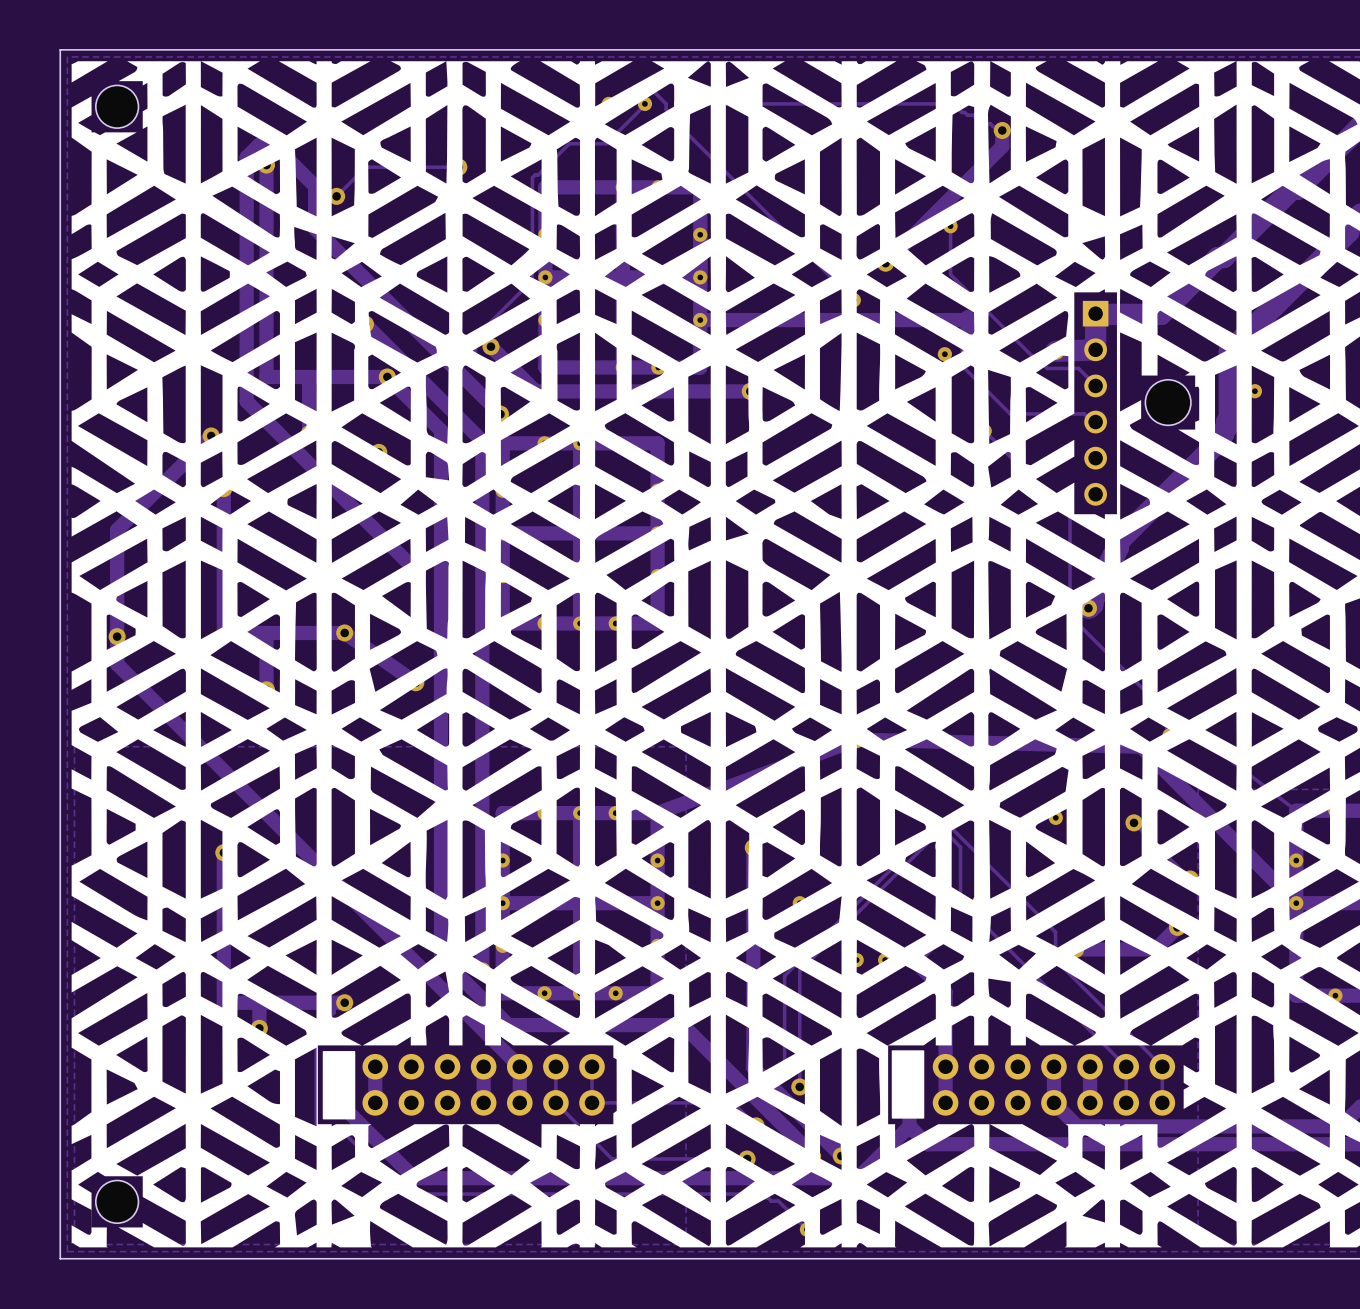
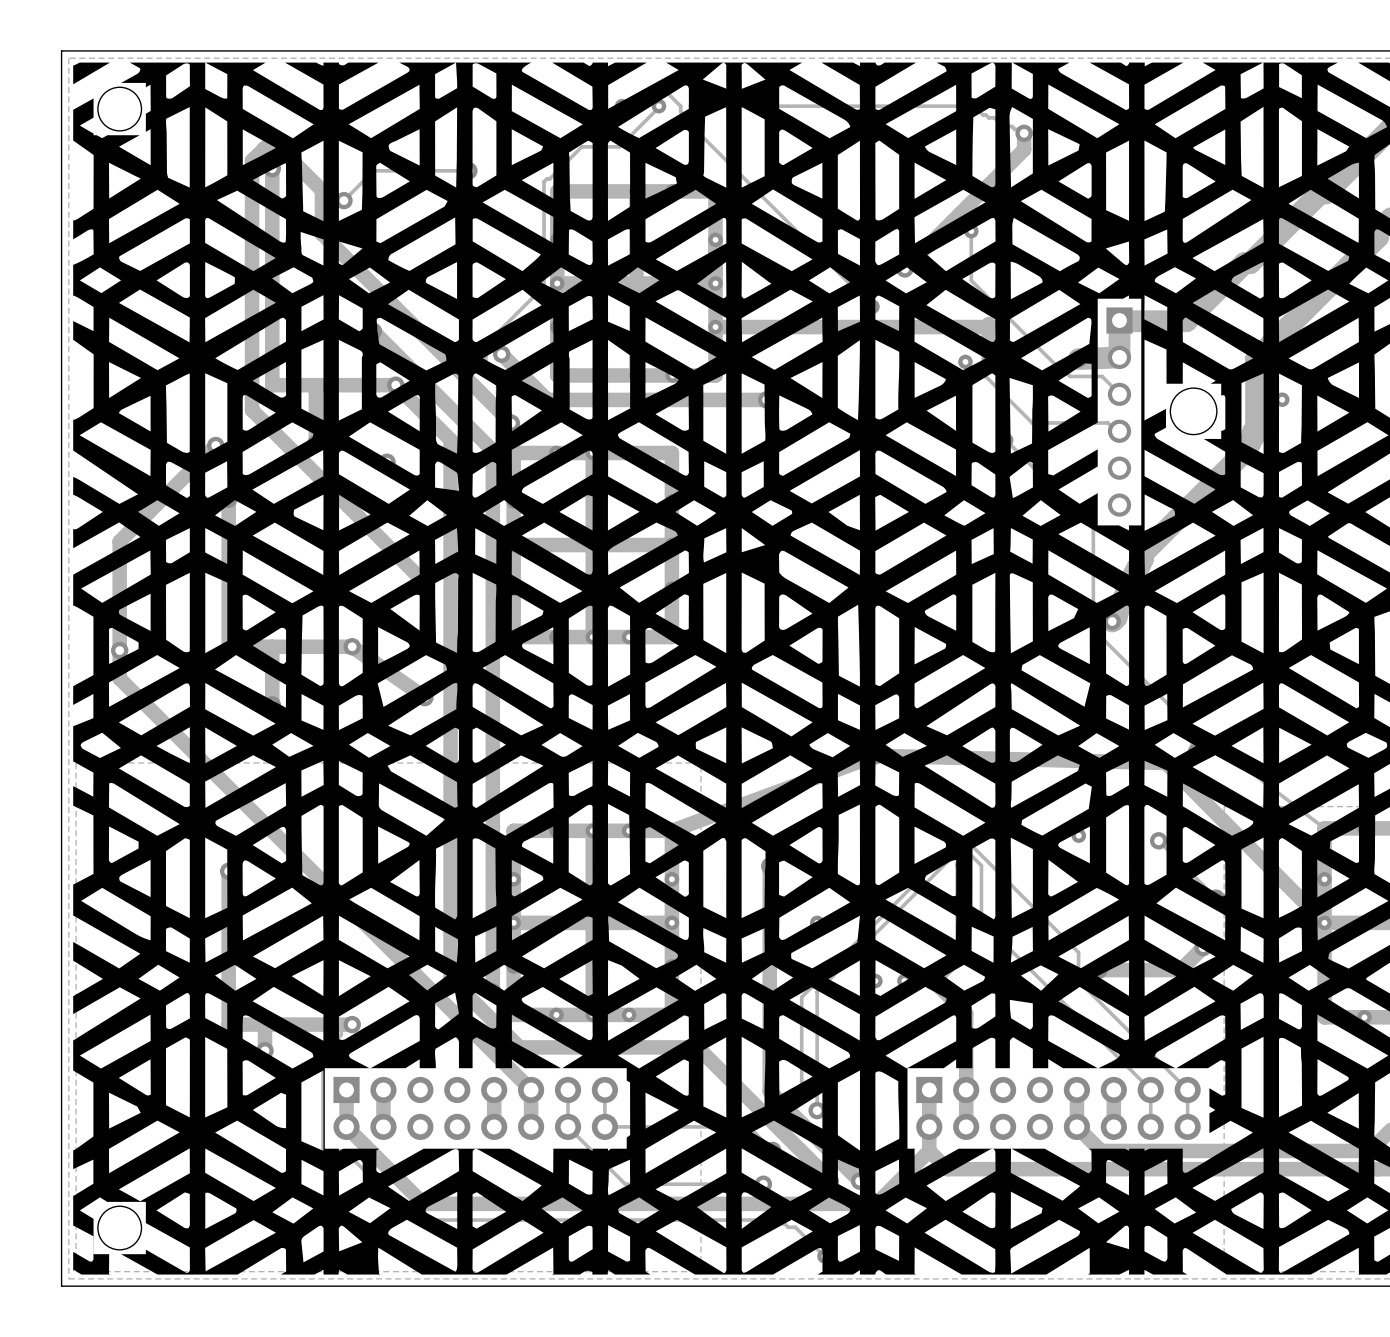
drawing: [891, 1050, 925, 1119] -> none
drawing: [322, 1051, 356, 1120] -> none

